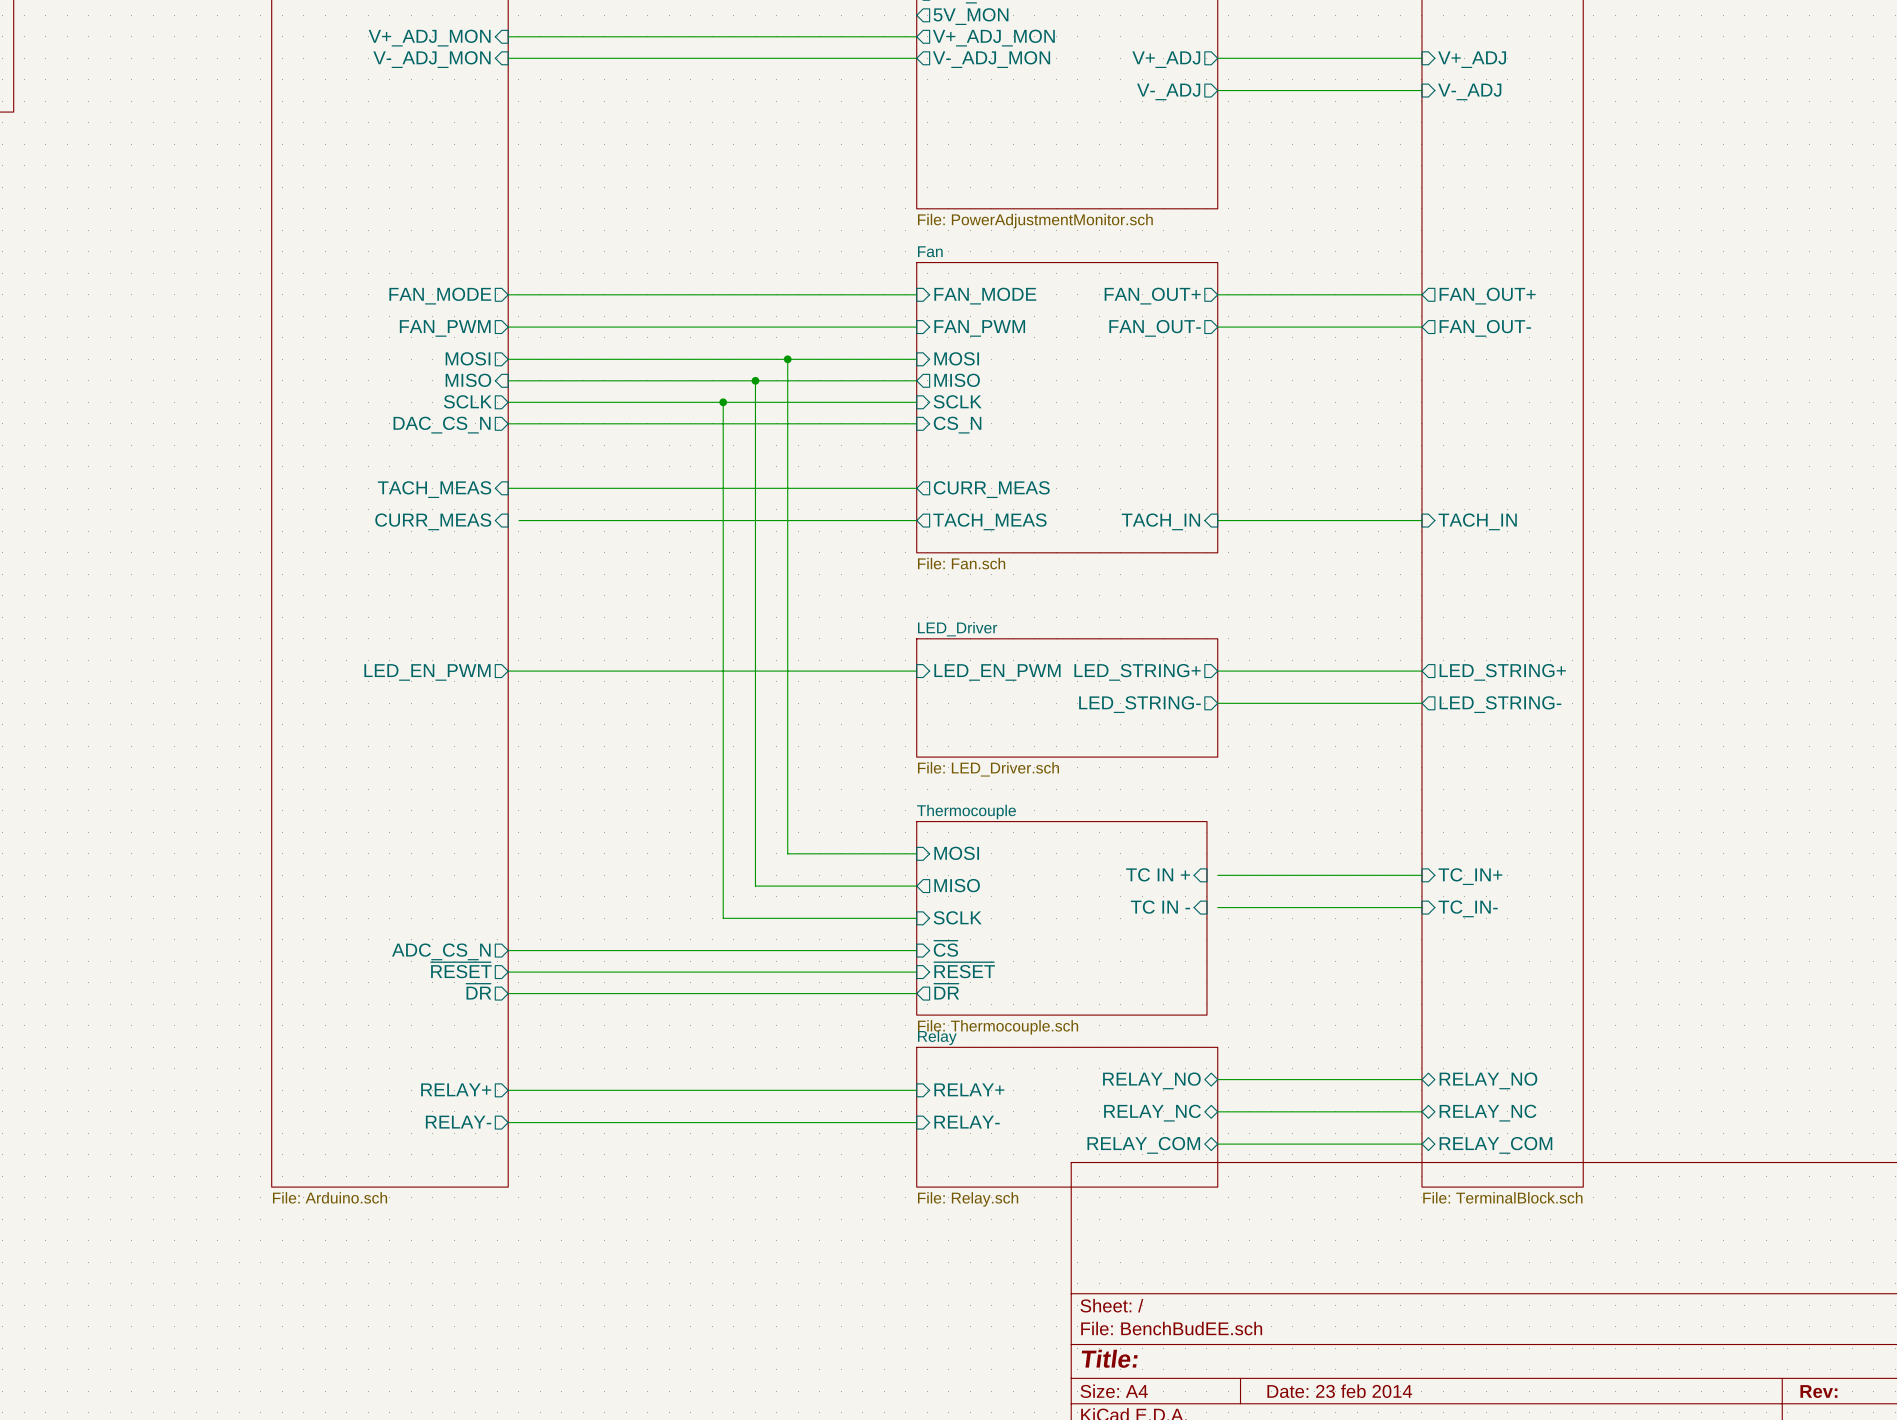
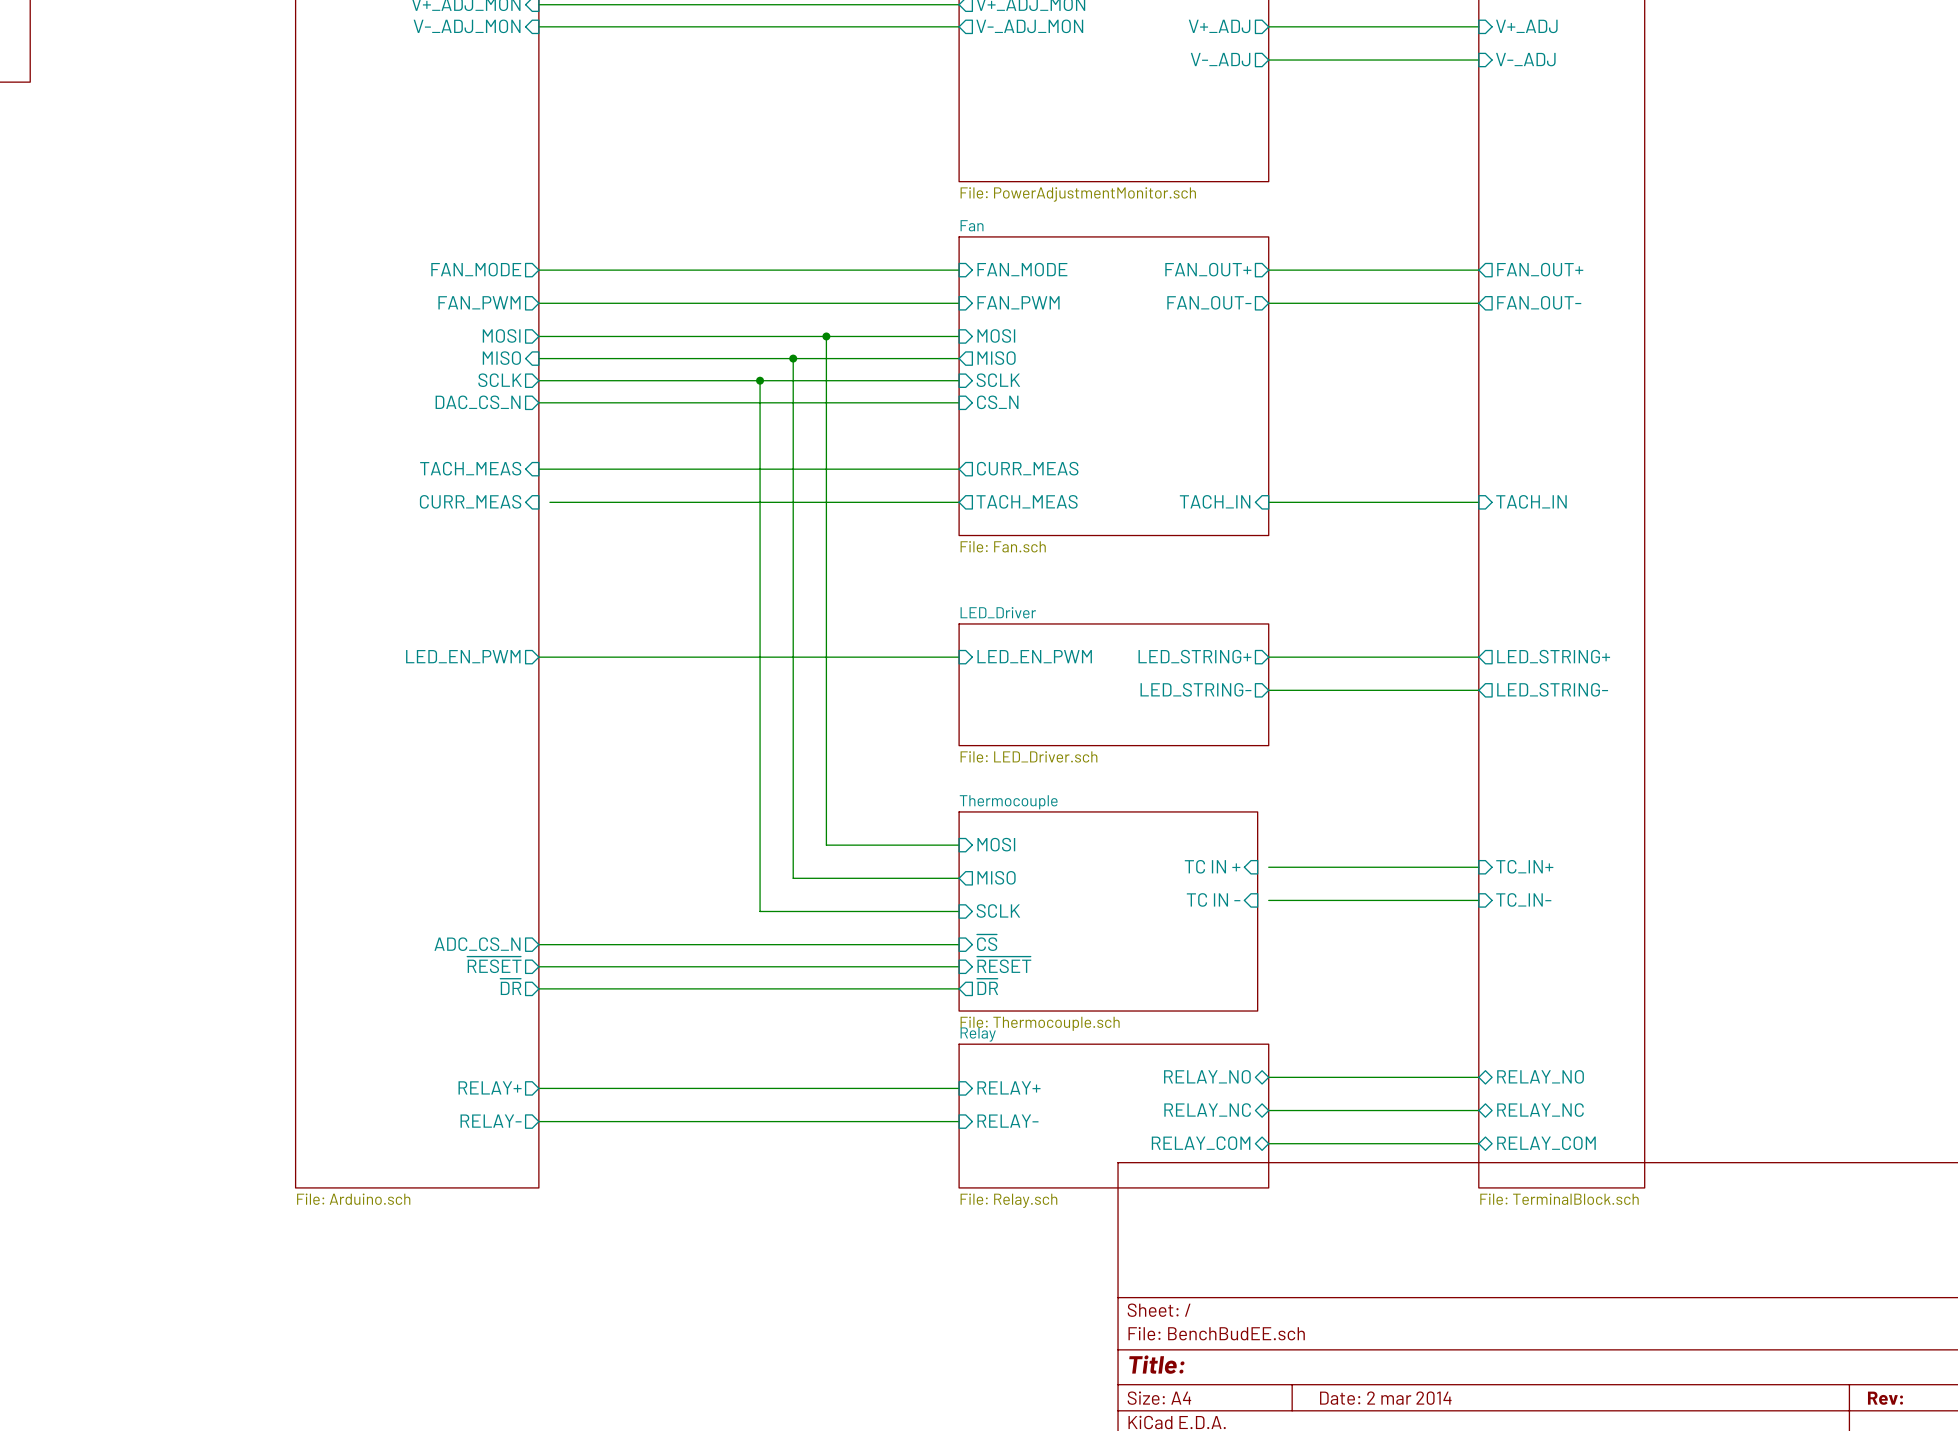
title block: Date: 23 feb 2014 (1339, 1391) -> Date: 2 mar 2014 (1385, 1398)

